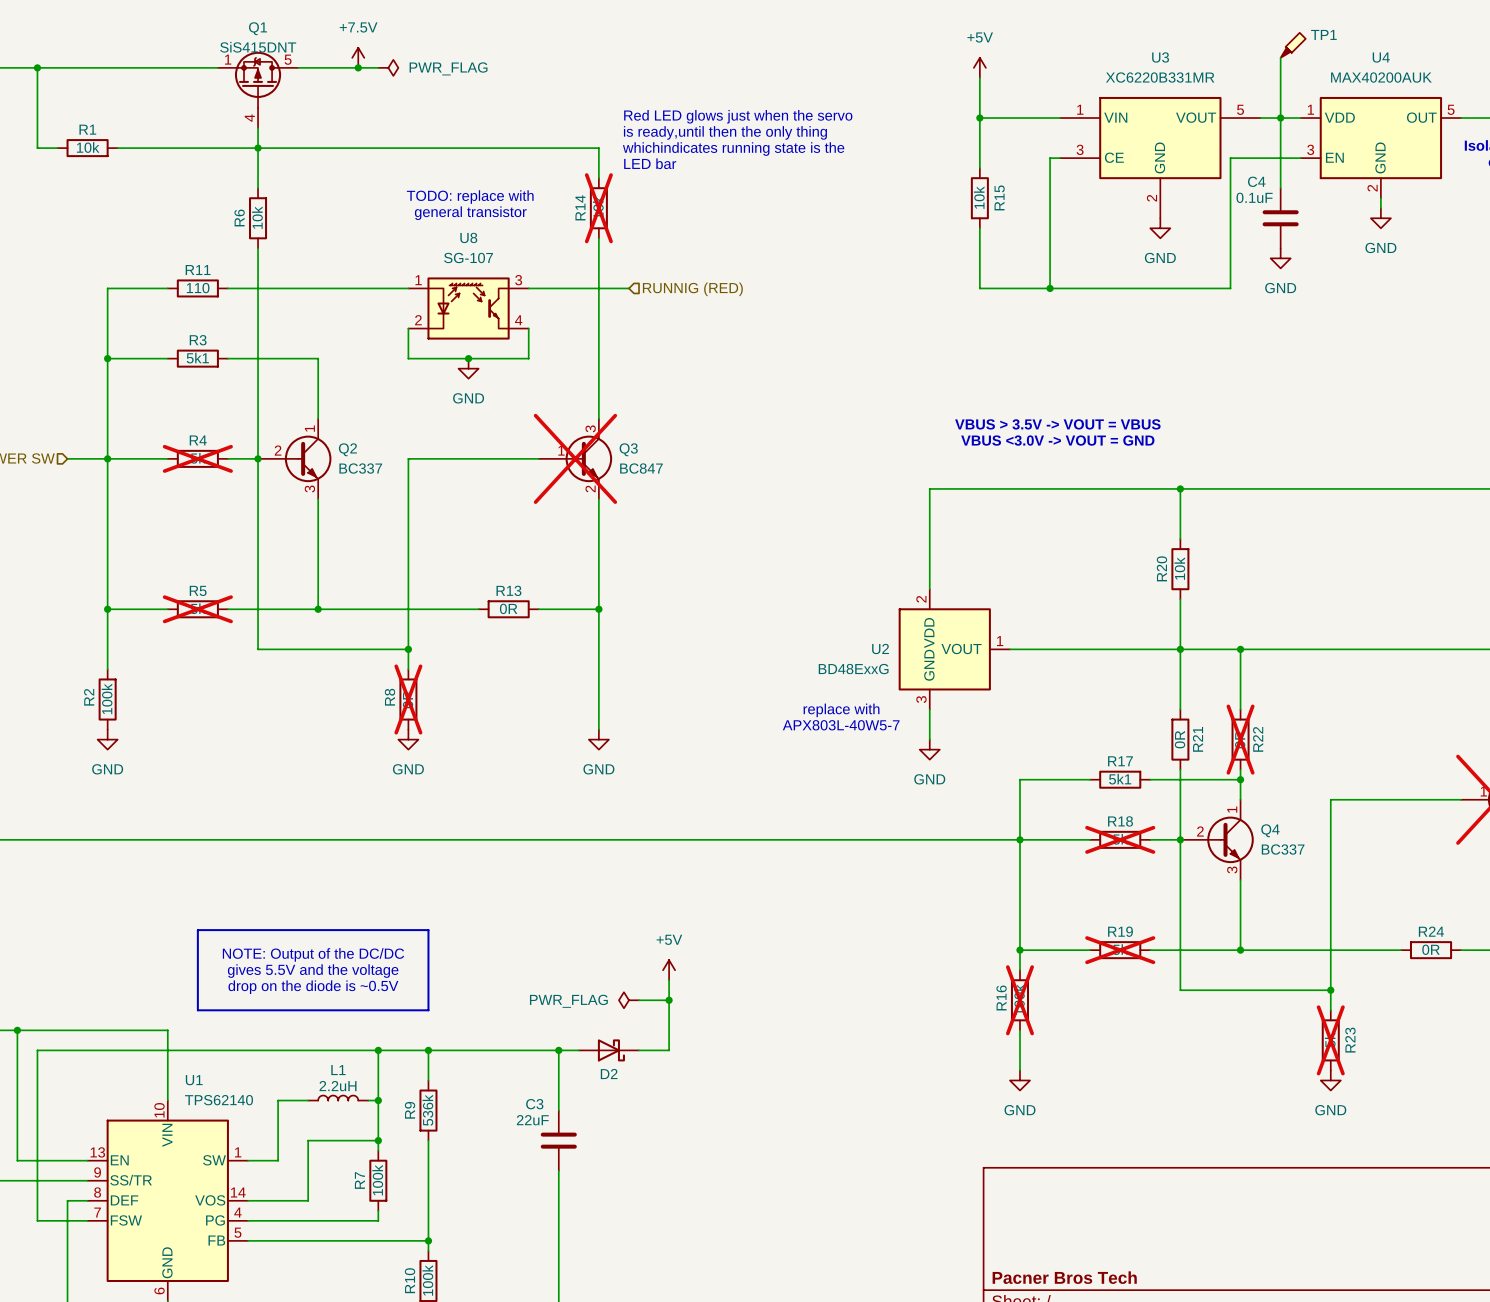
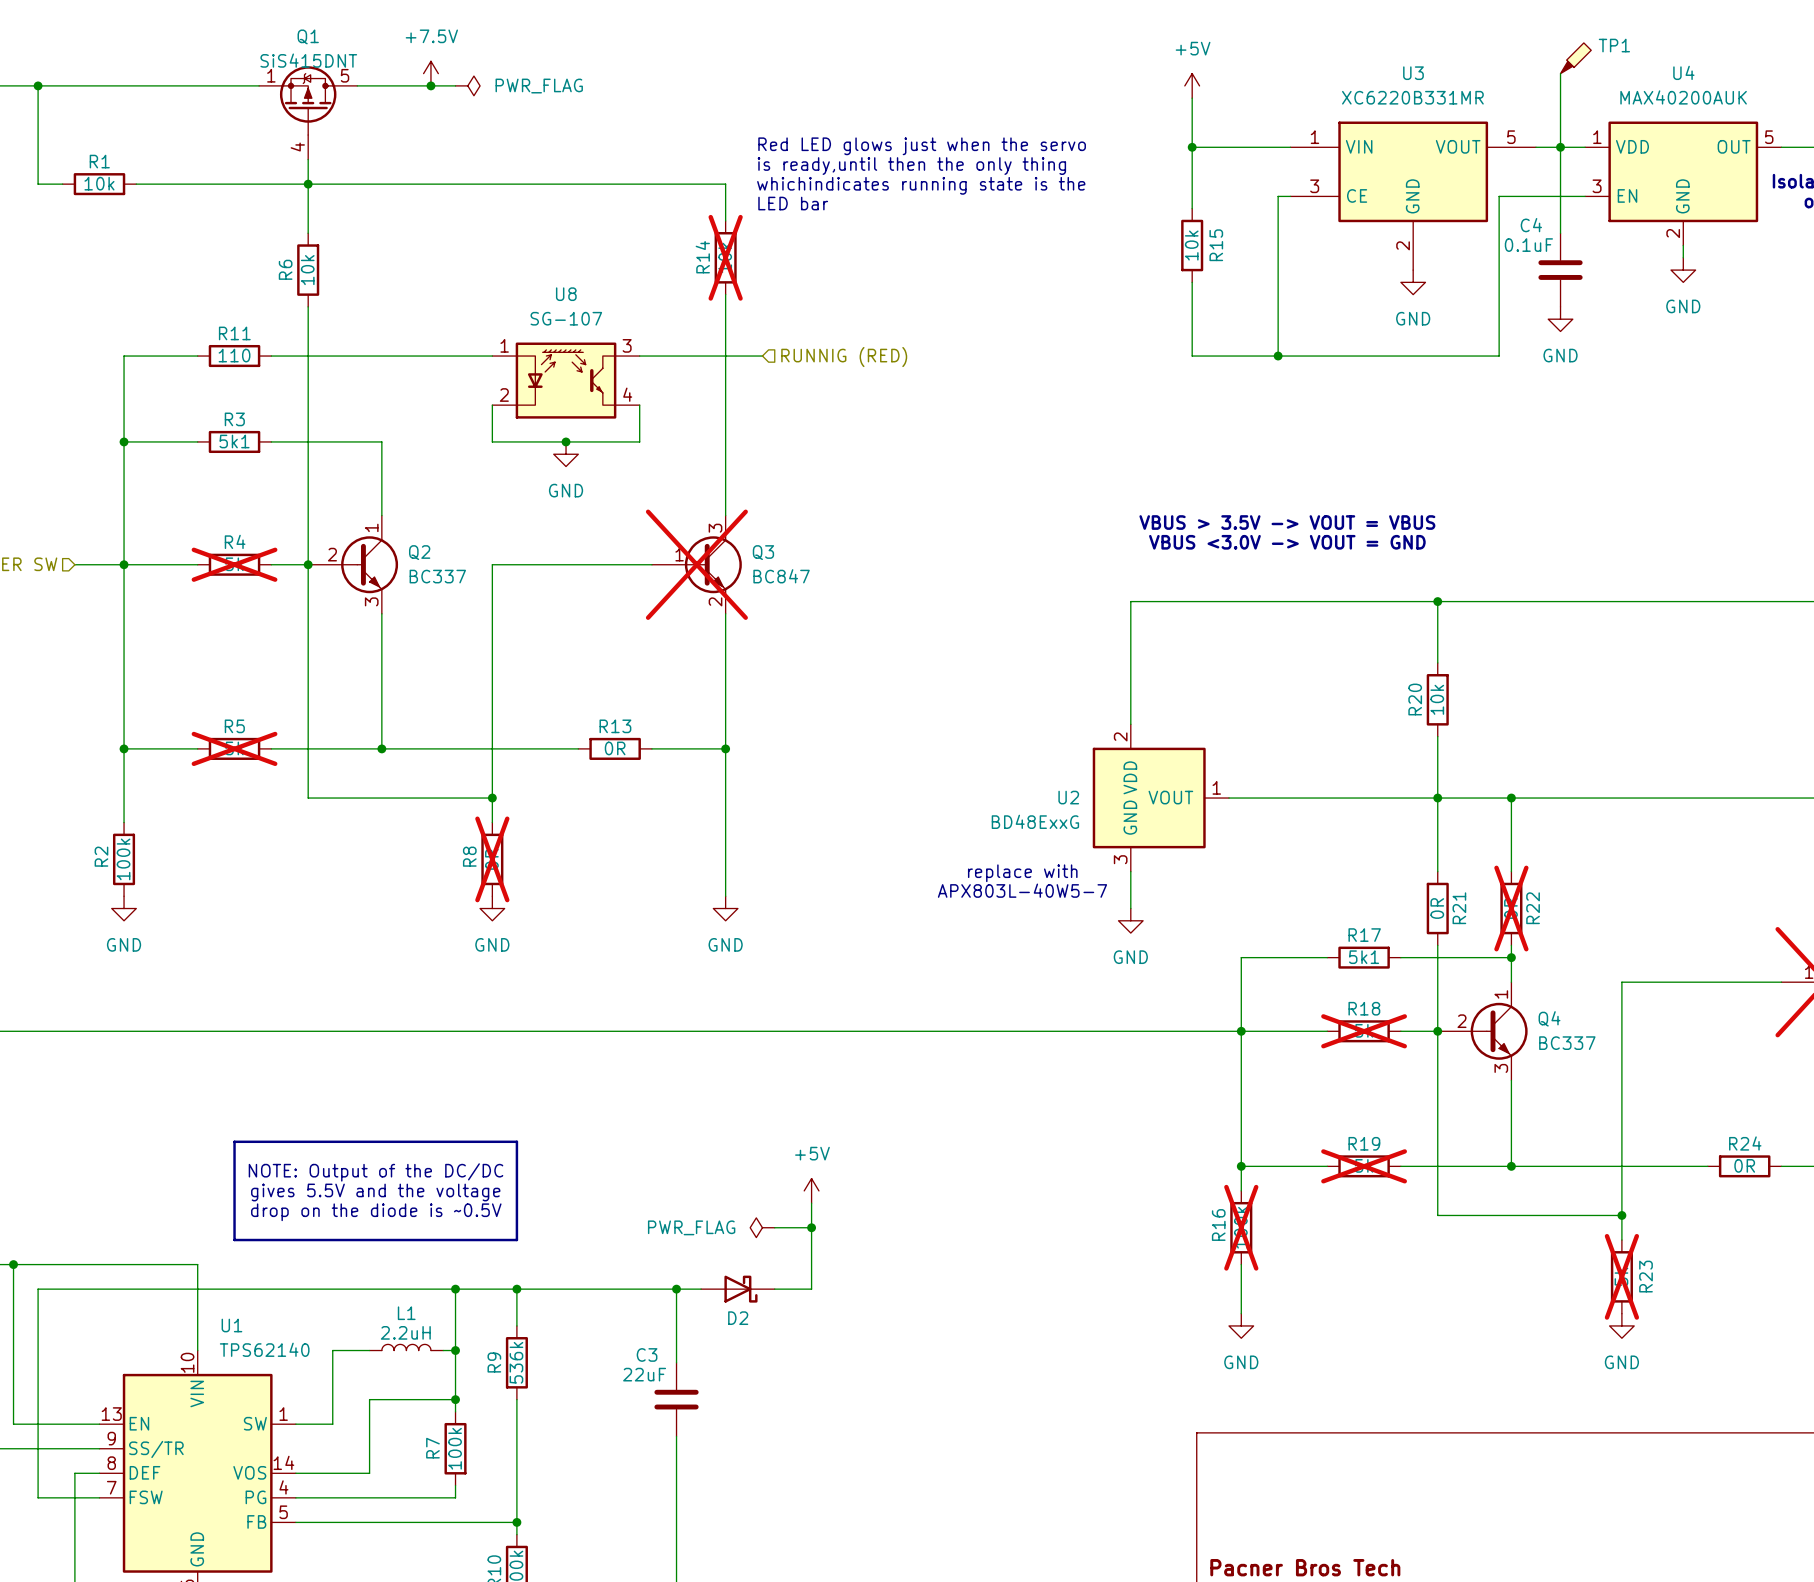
text: TODO: replace with (470, 197) -> none
text: general transistor (470, 213) -> none

